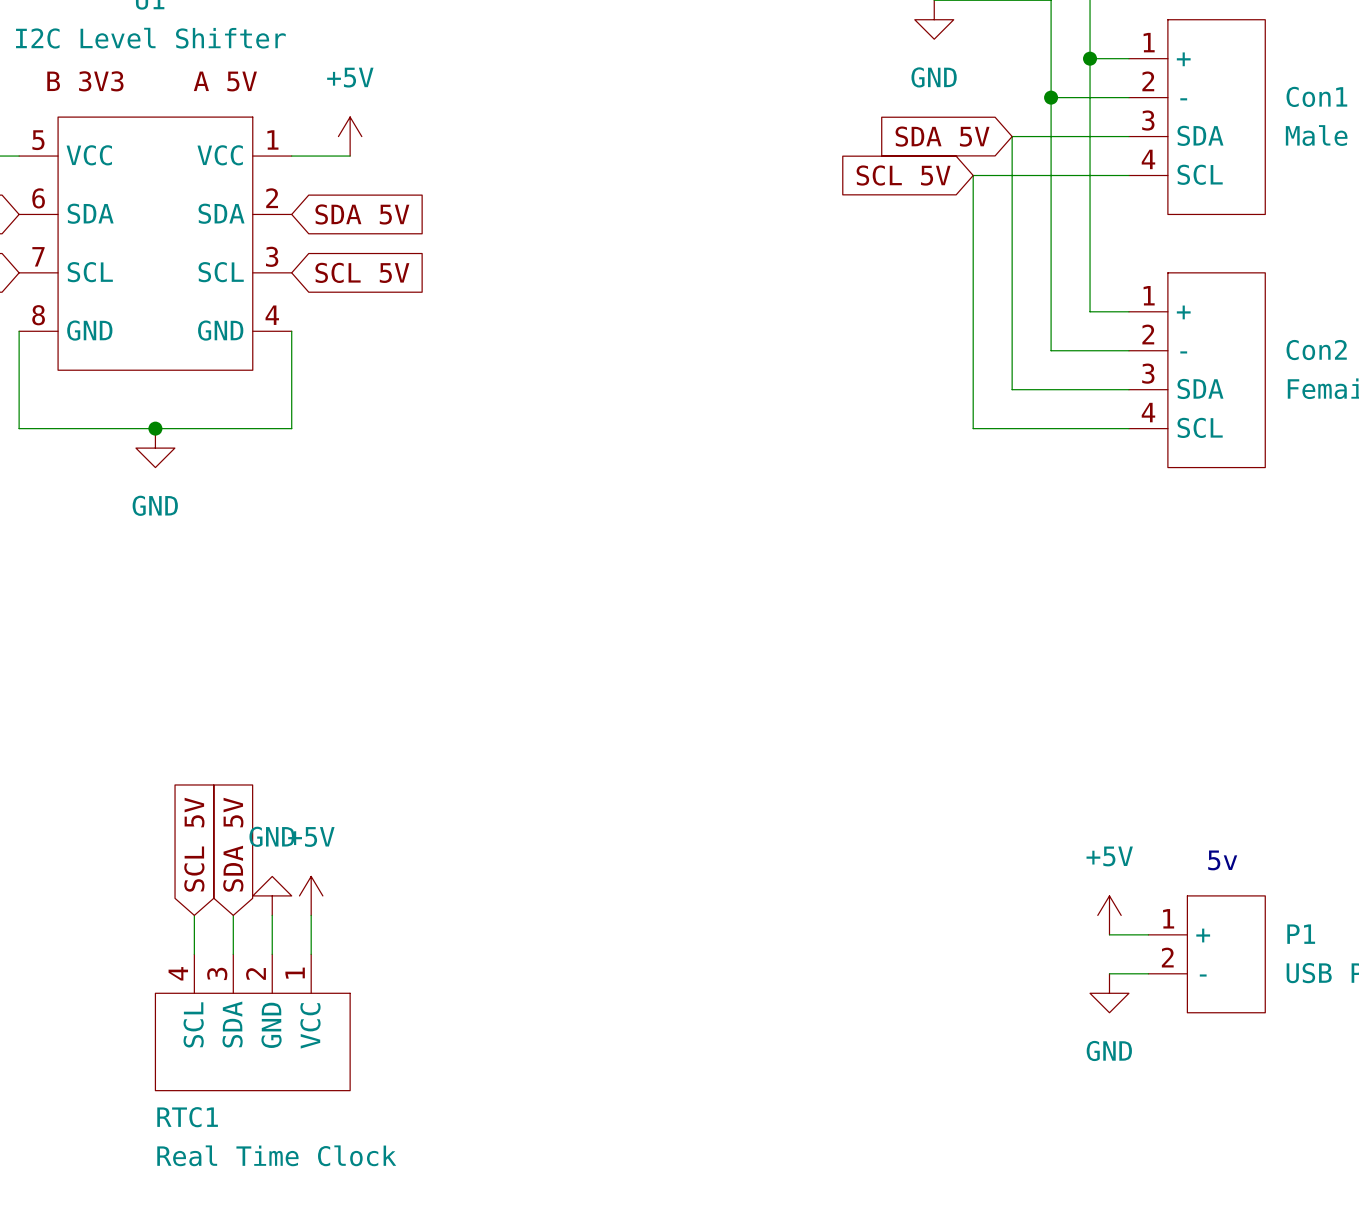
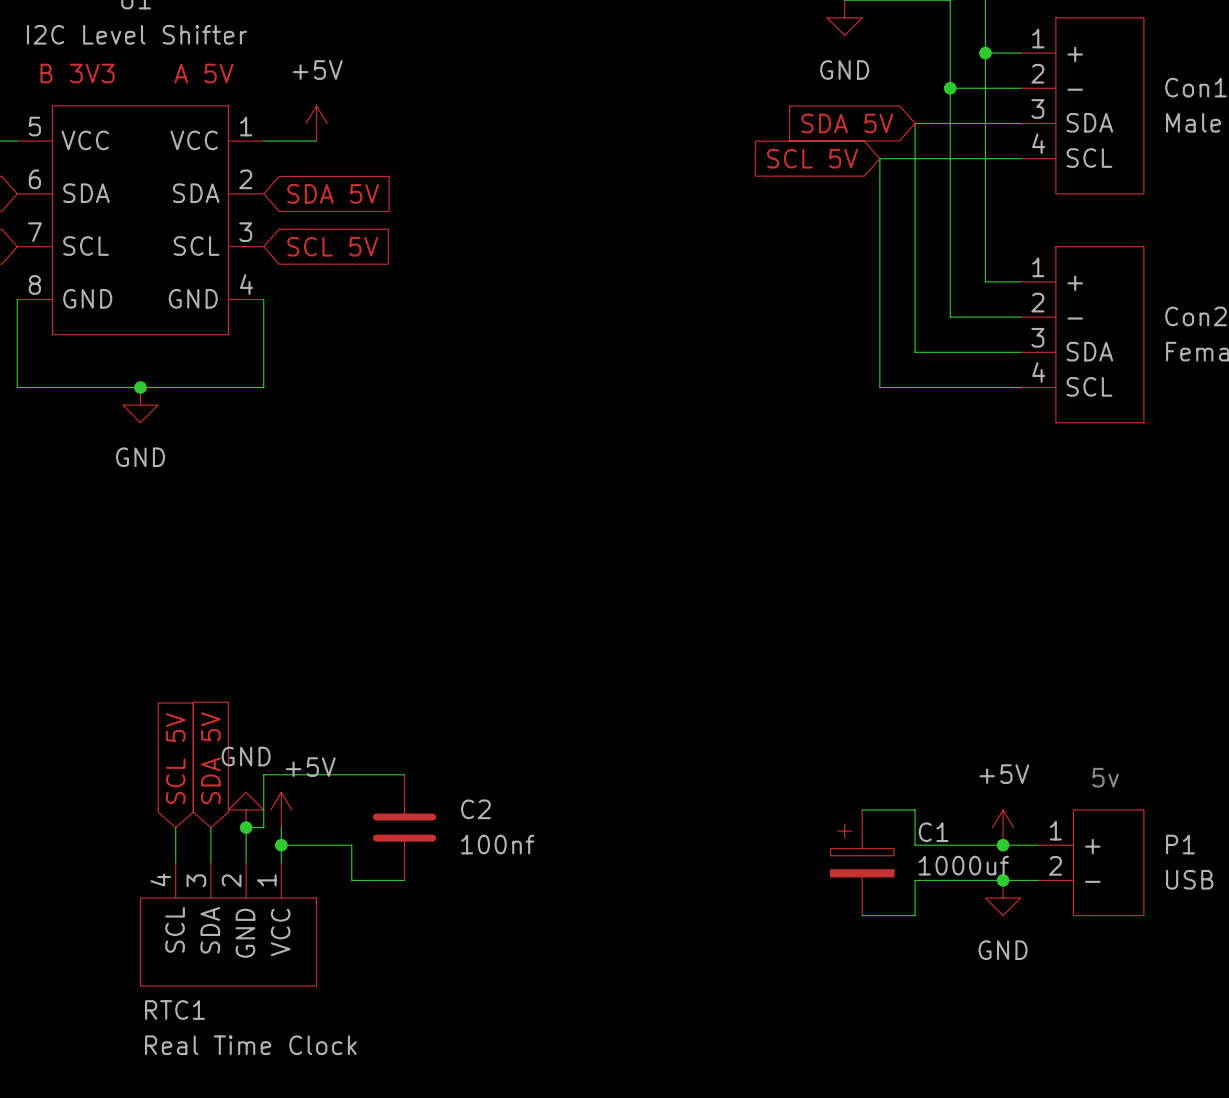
power symbol text position: +5V (311, 836) -> +5V (310, 767)
wire: none -> (404, 774) (263, 774) (263, 827) (246, 827)
wire: none -> (862, 809) (915, 809) (915, 845) (1003, 845)
junction: none -> (246, 827)
C2: none -> 100nf (404, 827)
wire: none -> (281, 845) (351, 845) (351, 880) (404, 880)
junction: none -> (281, 845)
junction: none -> (1003, 845)
C1: none -> 1000uf (862, 862)
wire: none -> (1003, 880) (915, 880) (915, 915) (862, 915)
junction: none -> (1003, 880)

